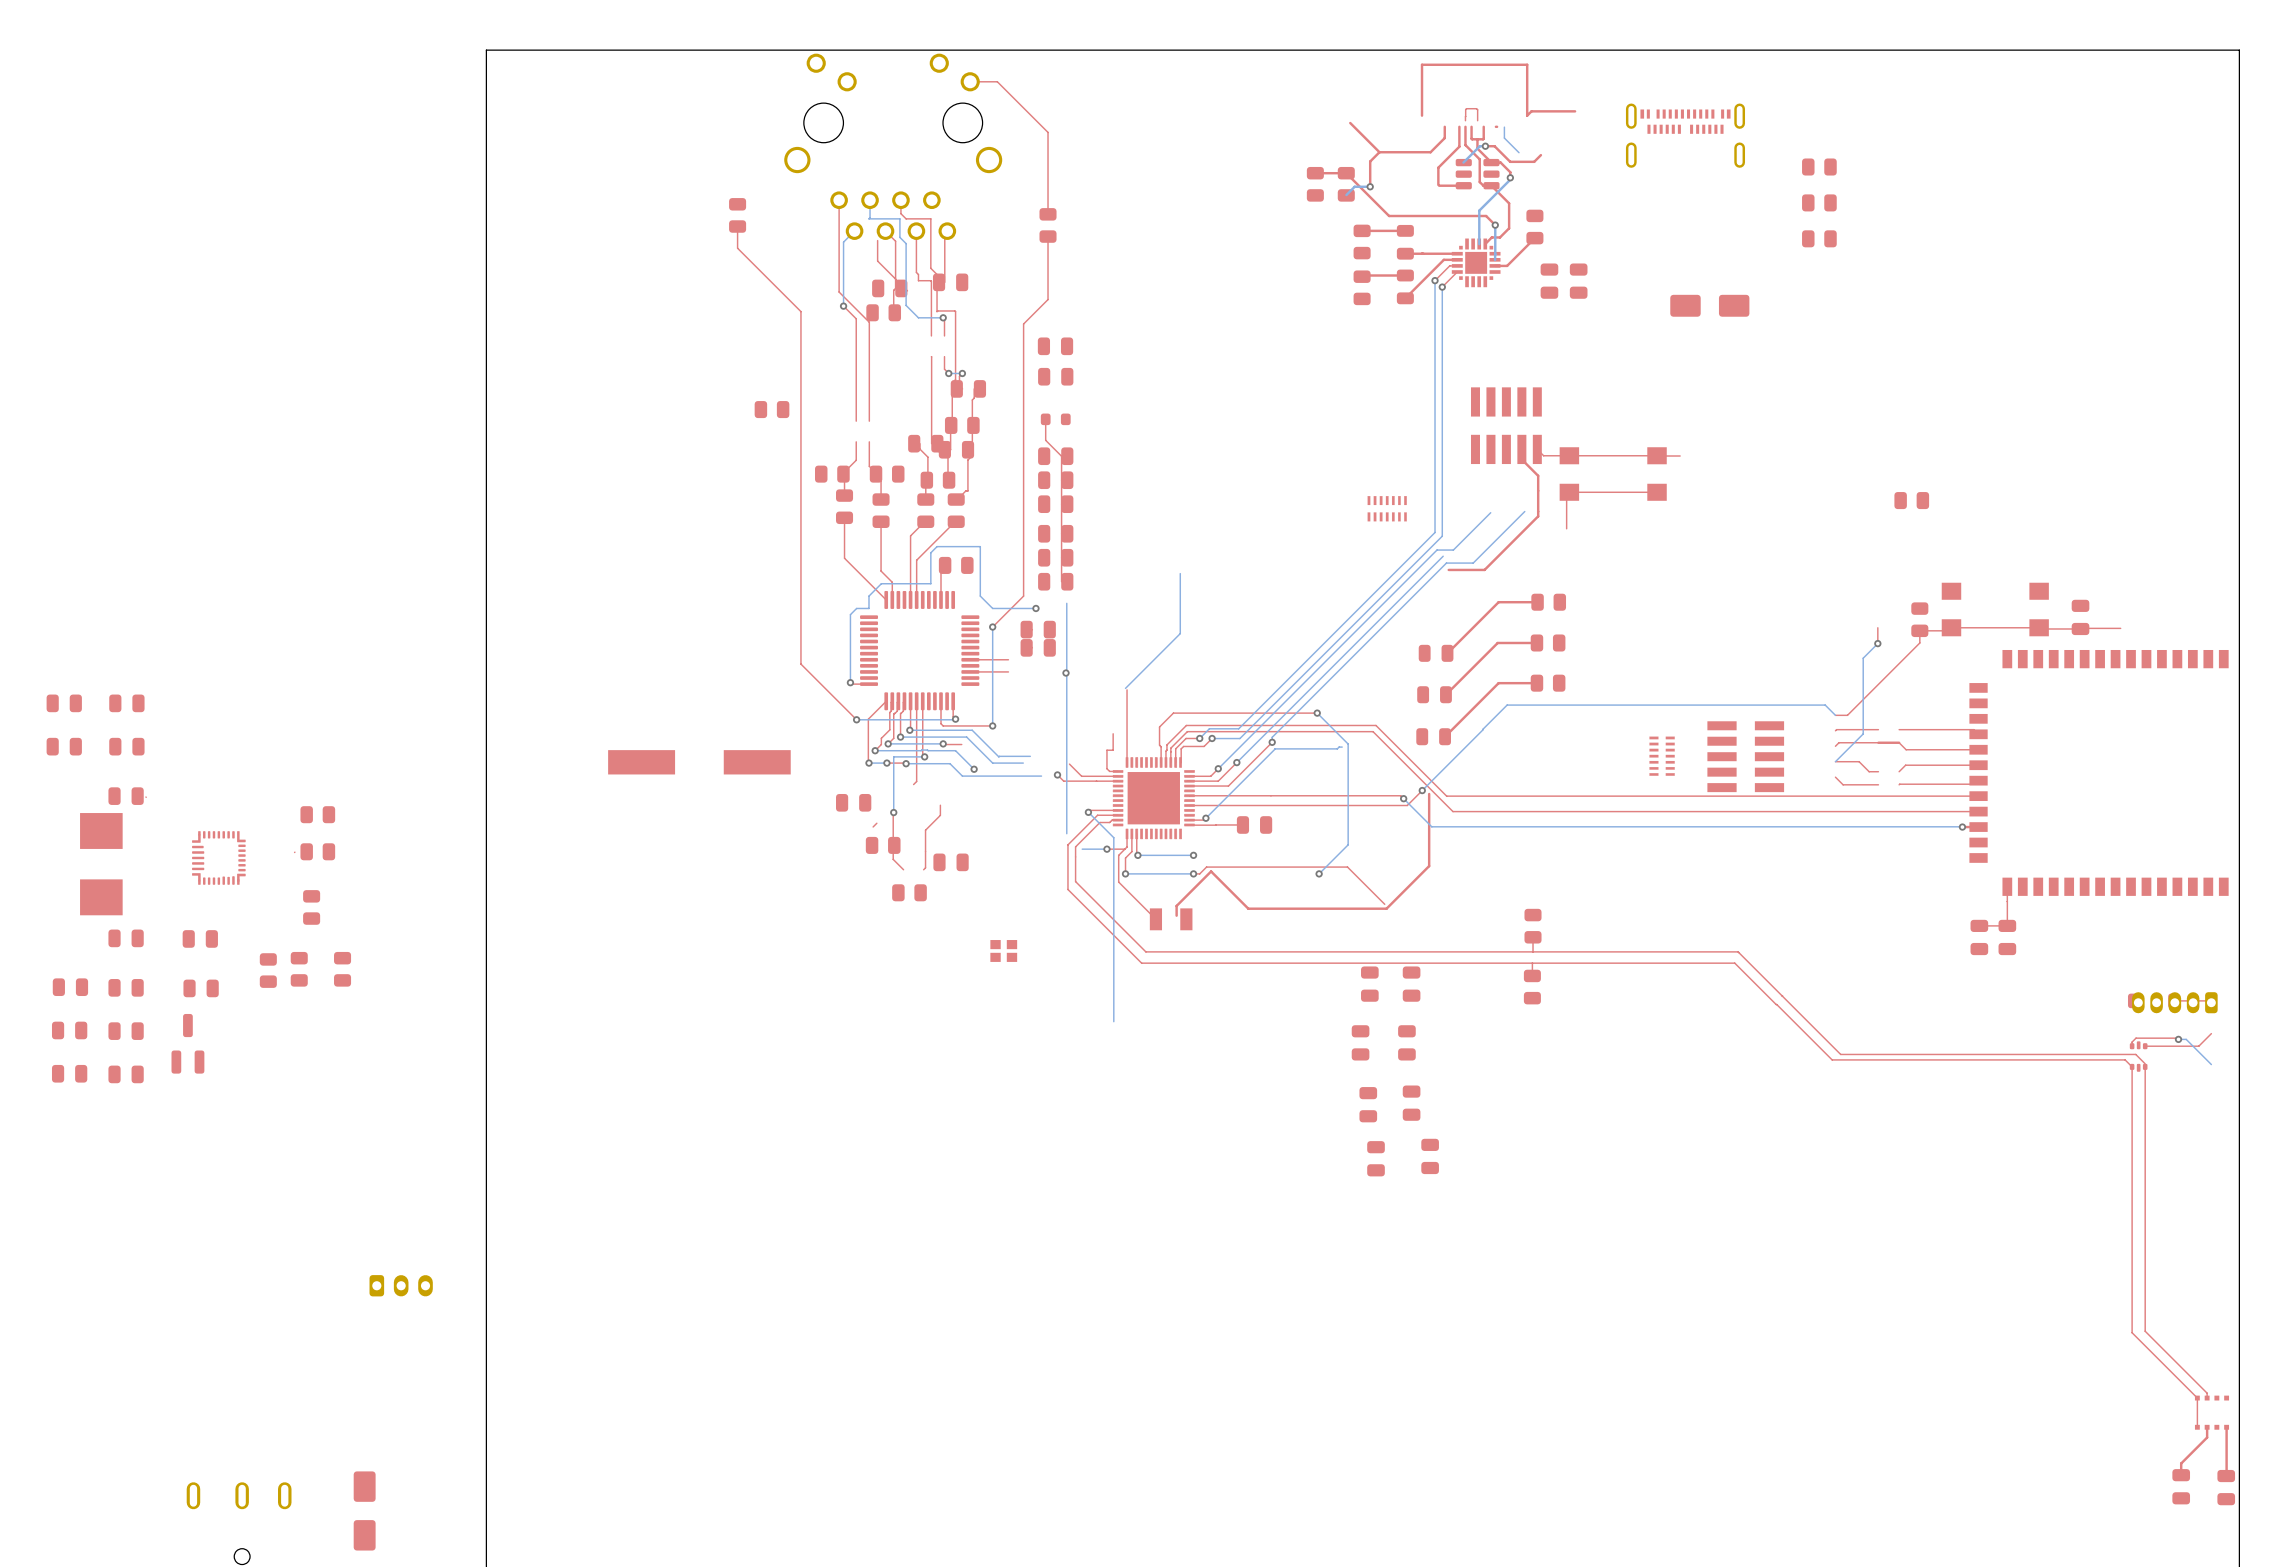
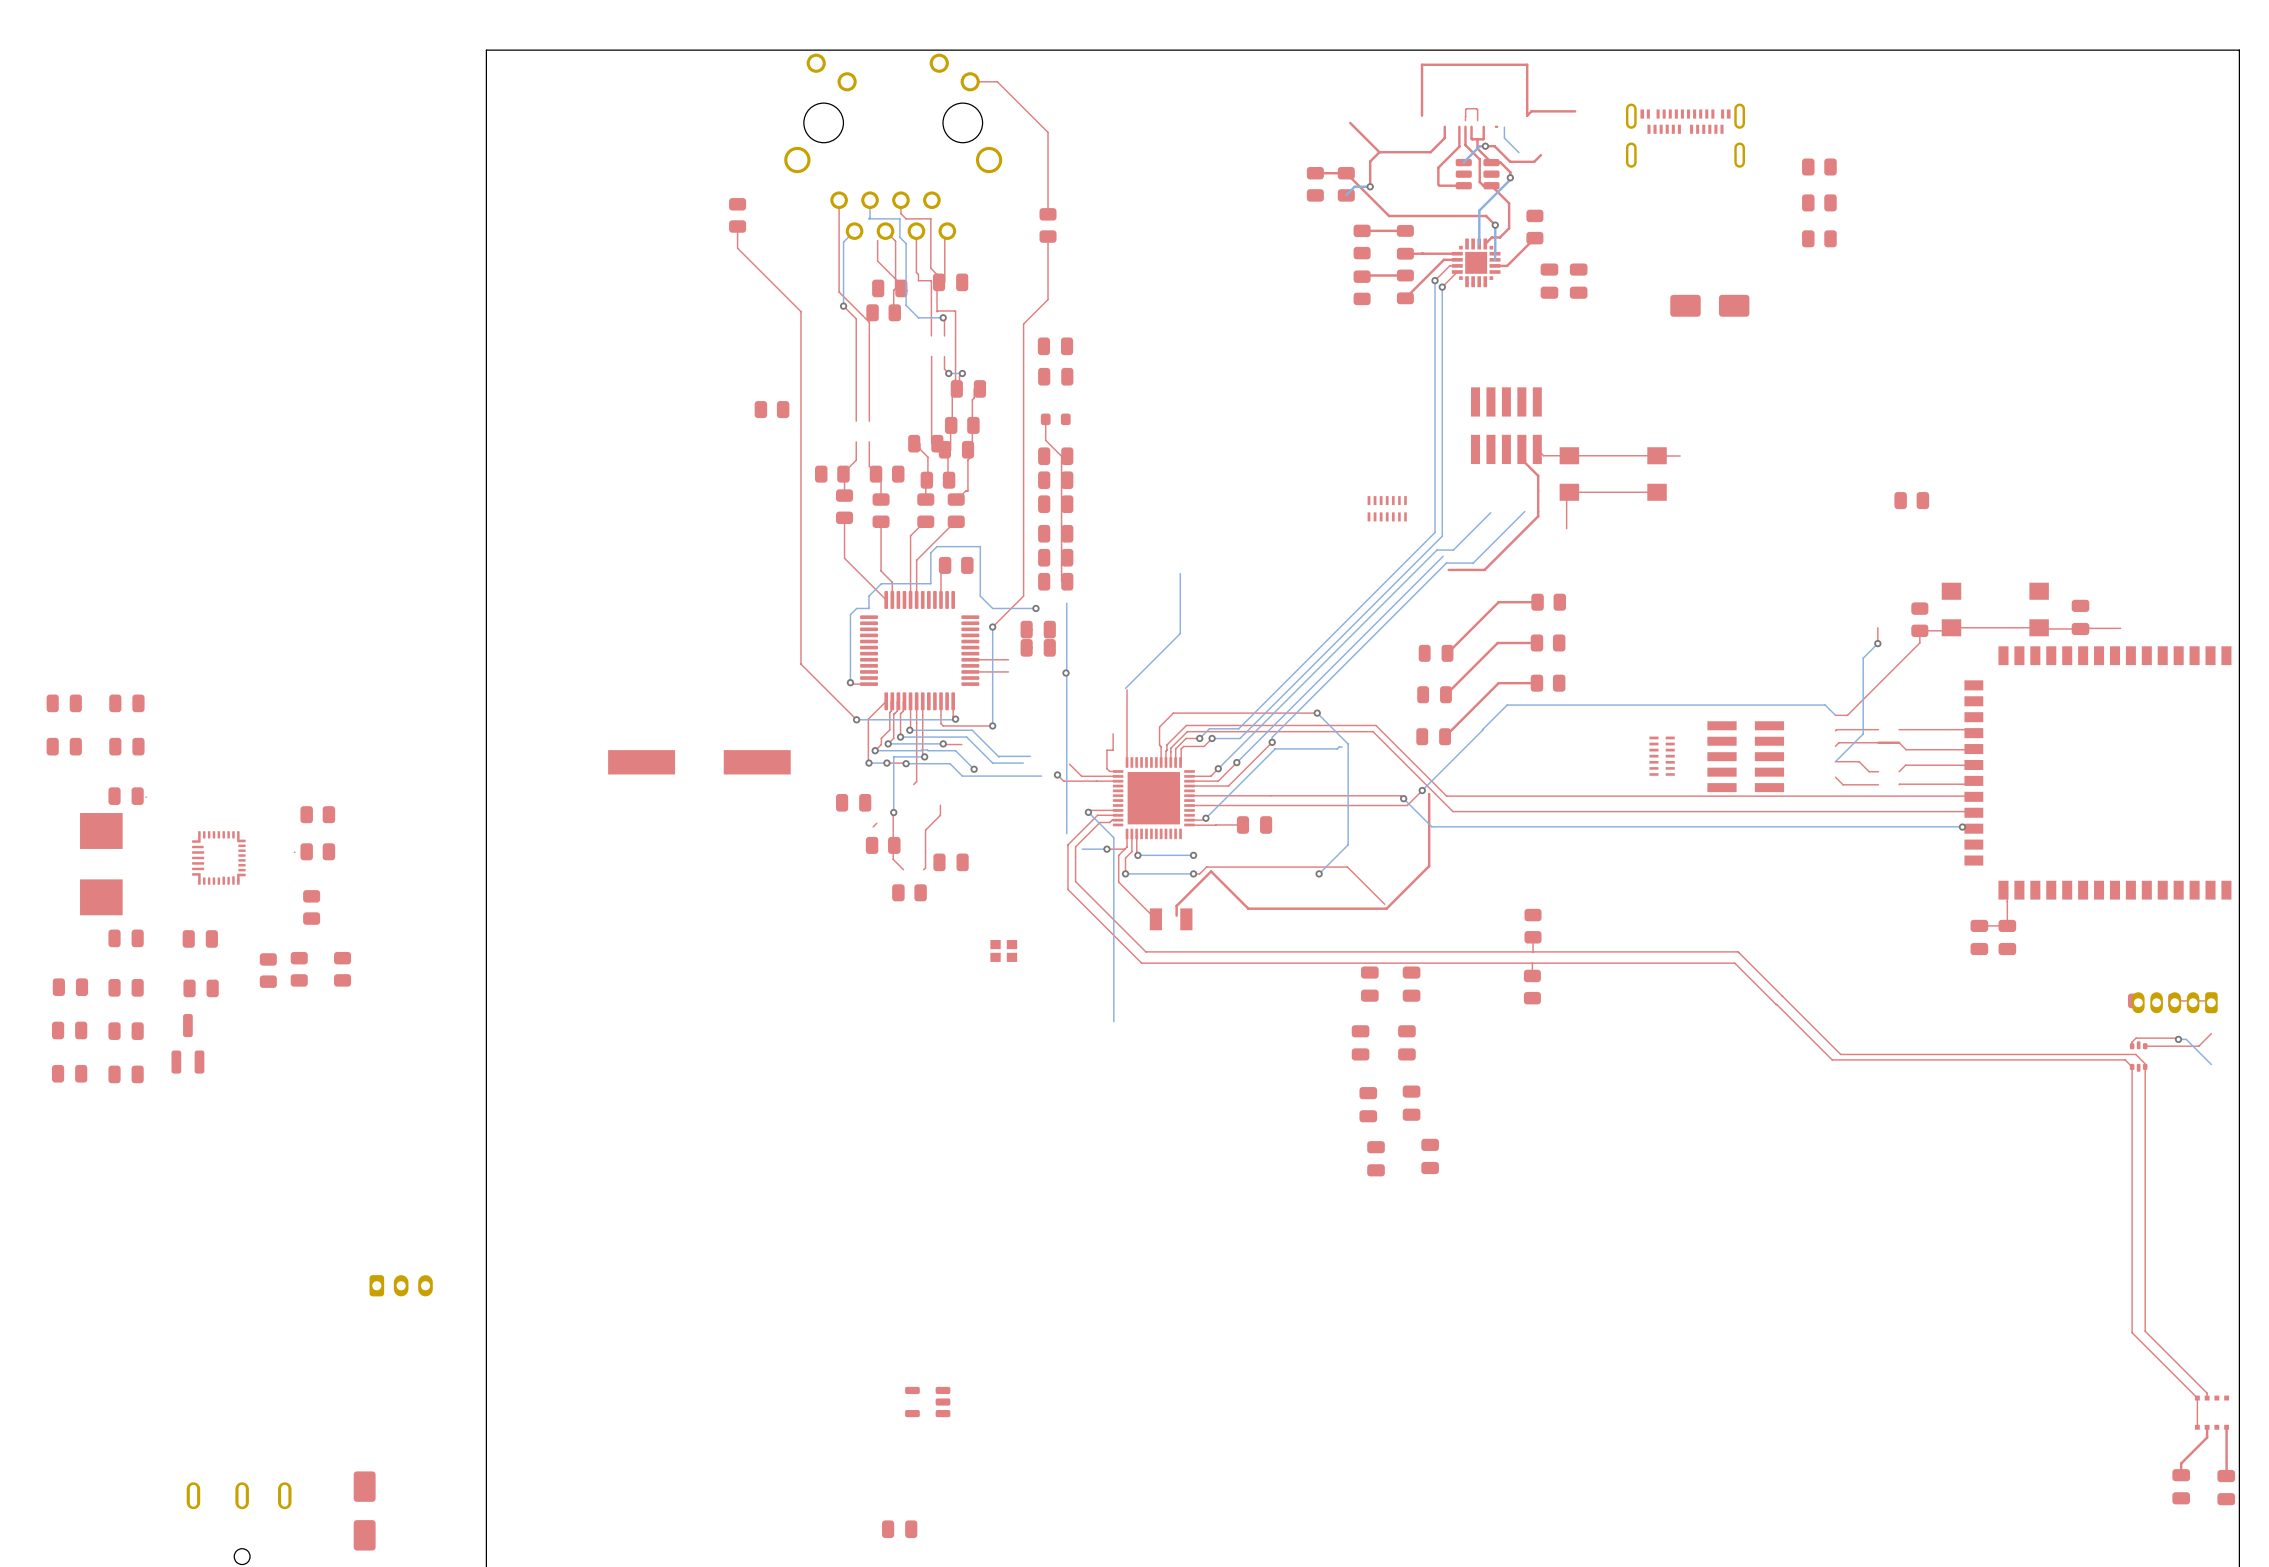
part footprint: [1969, 649, 2229, 896] -> [1964, 646, 2232, 900]
part: none -> (927, 1402)
part: none -> (899, 1529)

